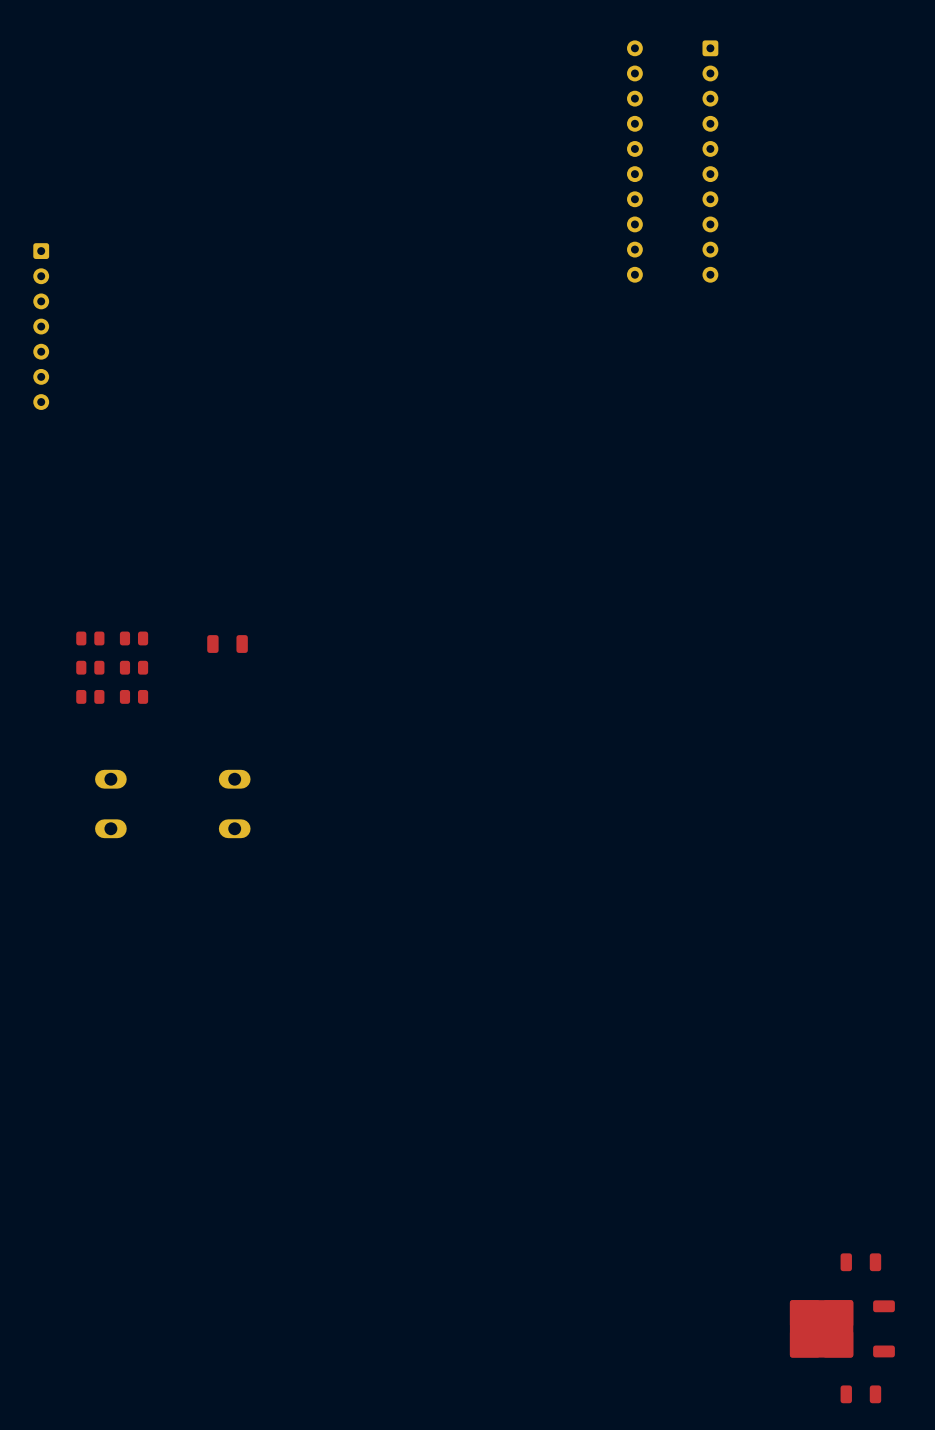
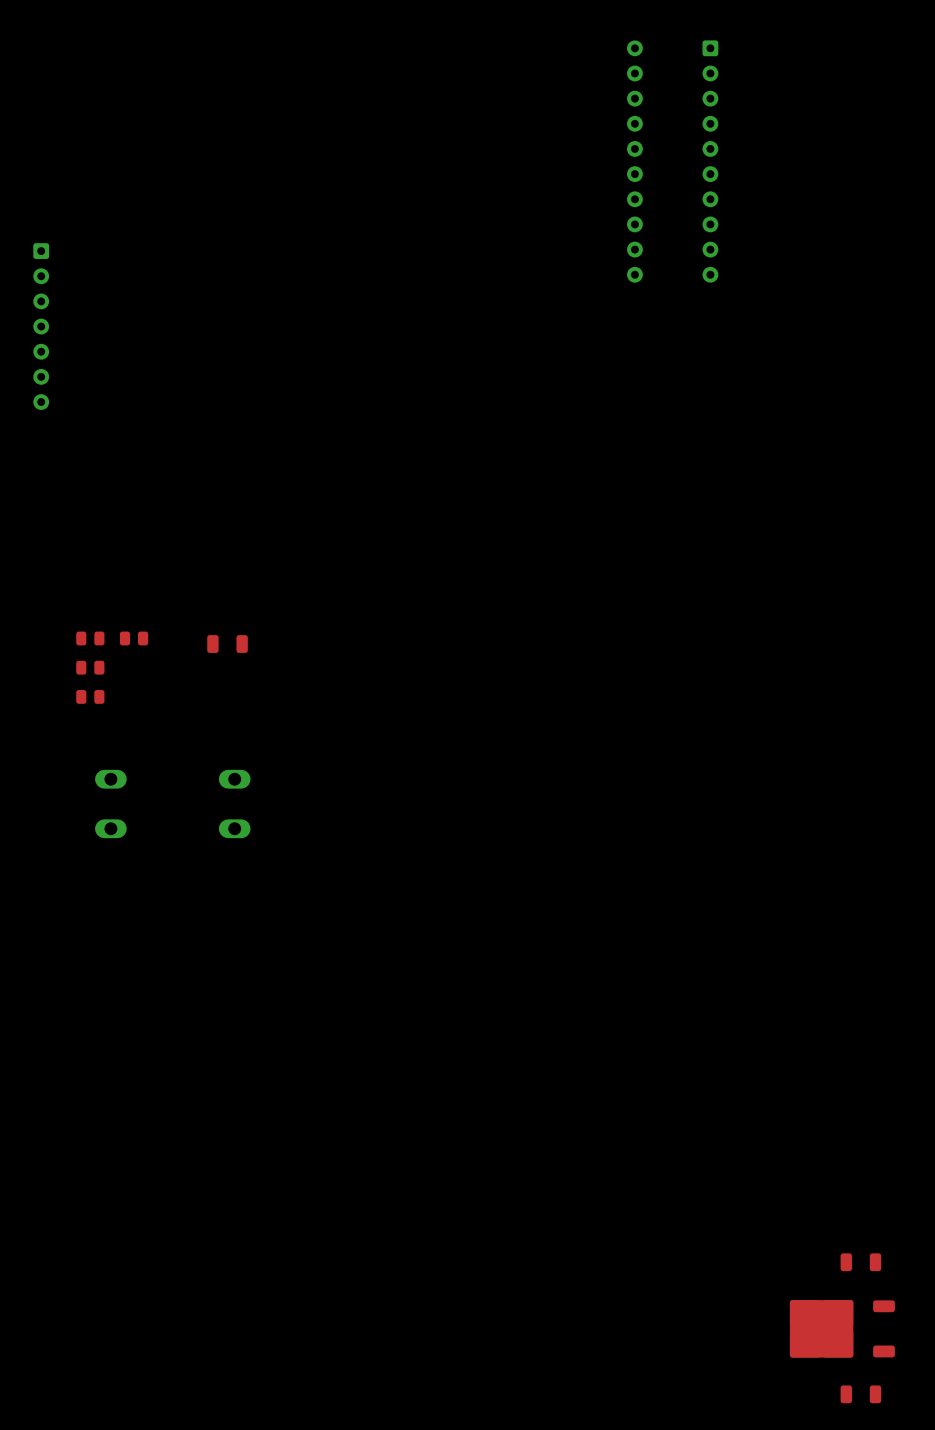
part: (134, 667) -> none
part: (134, 696) -> none

